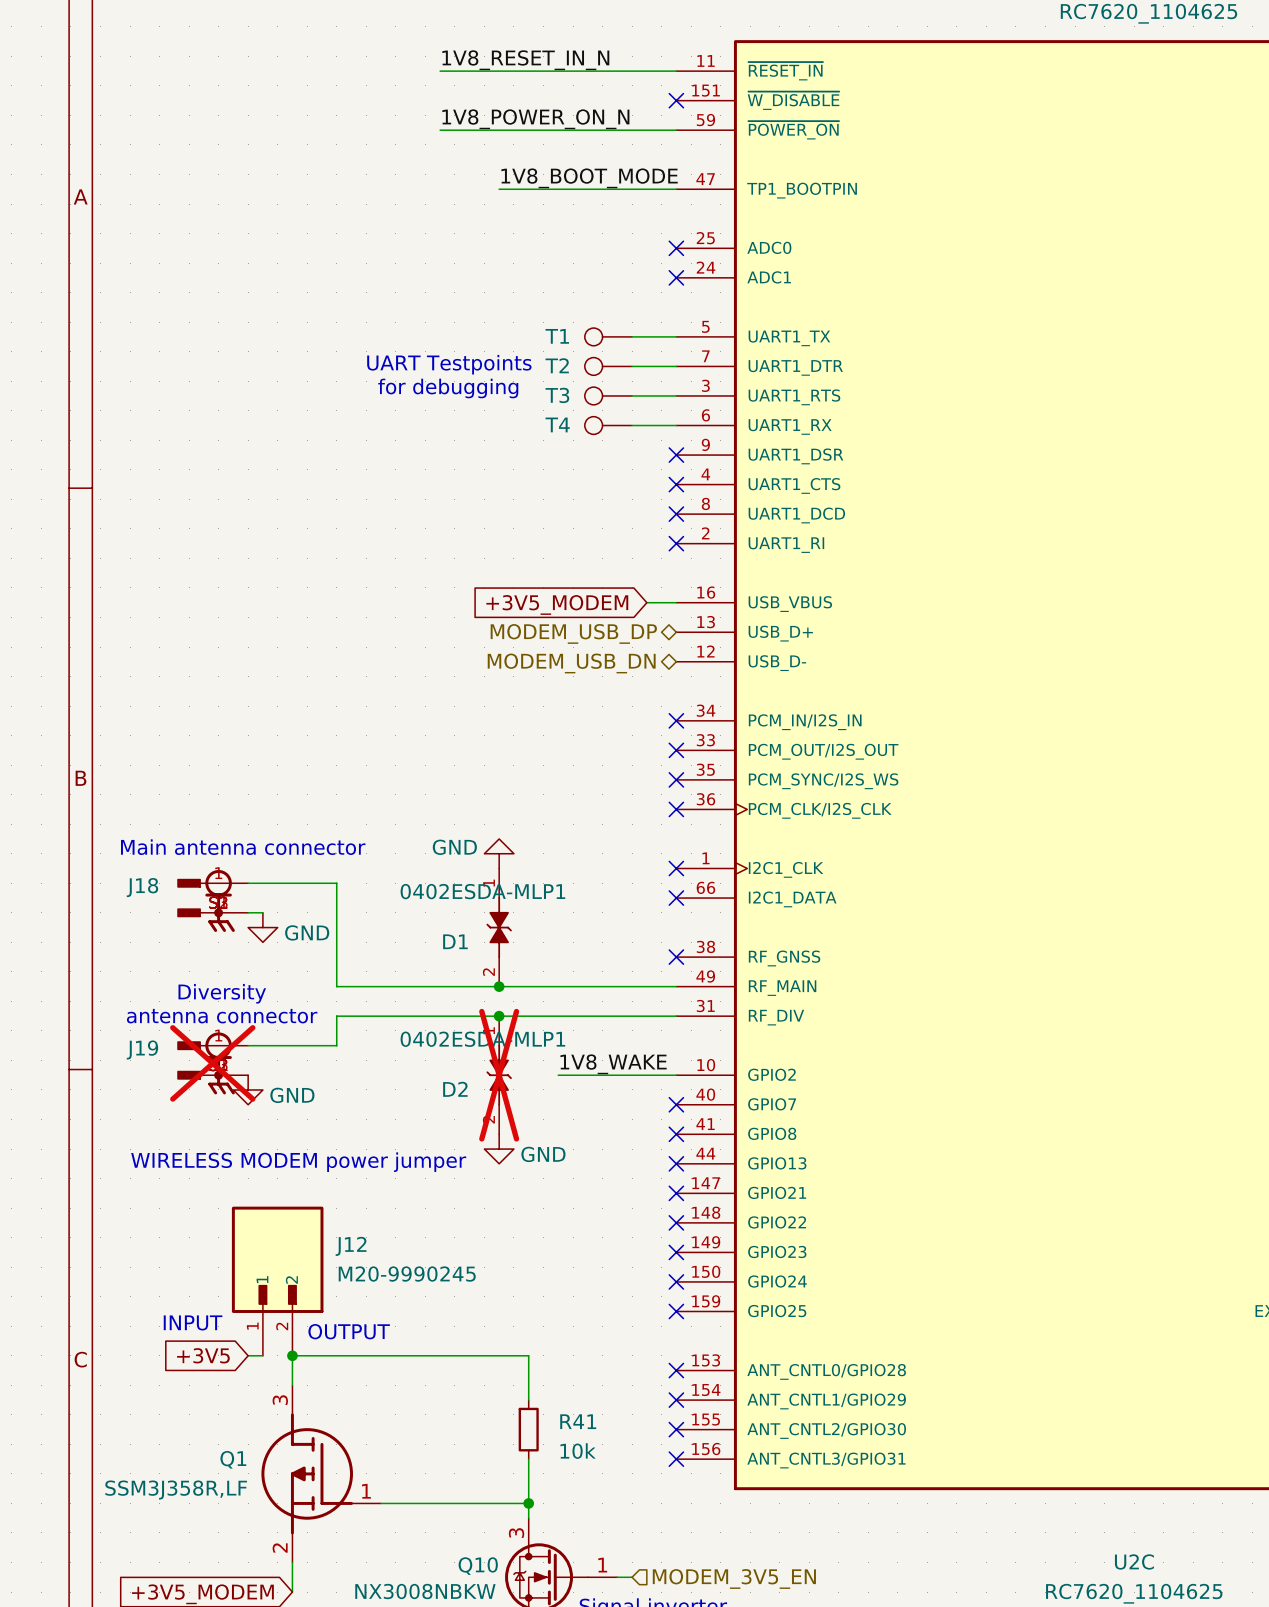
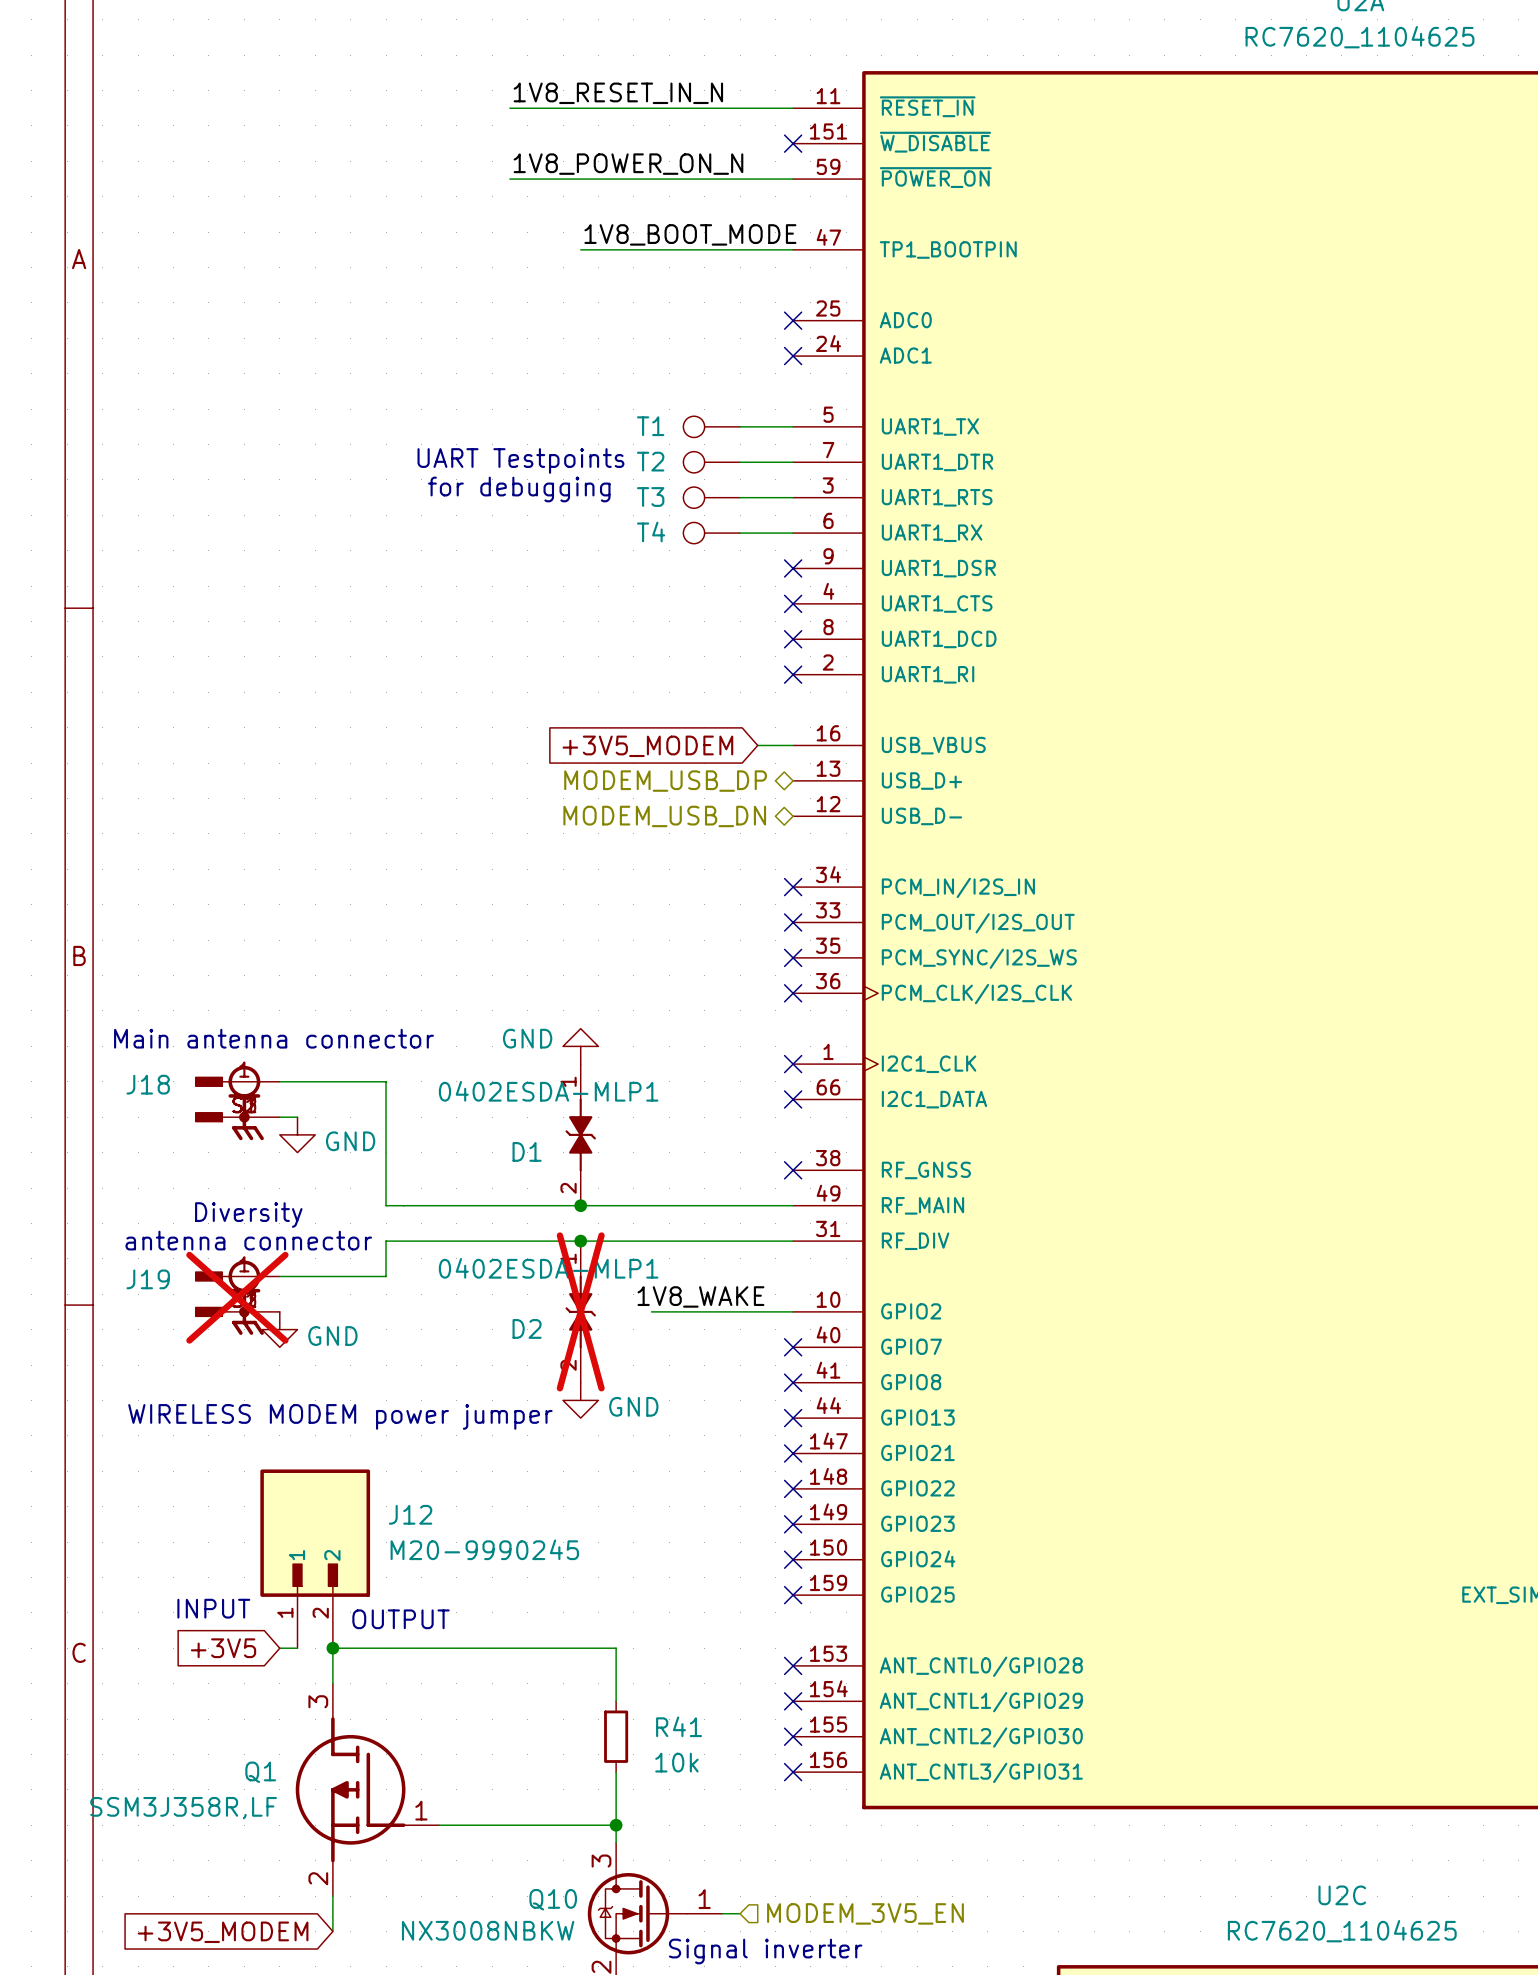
label position: 1V8_WAKE (613, 1064) -> 1V8_WAKE (700, 1296)

